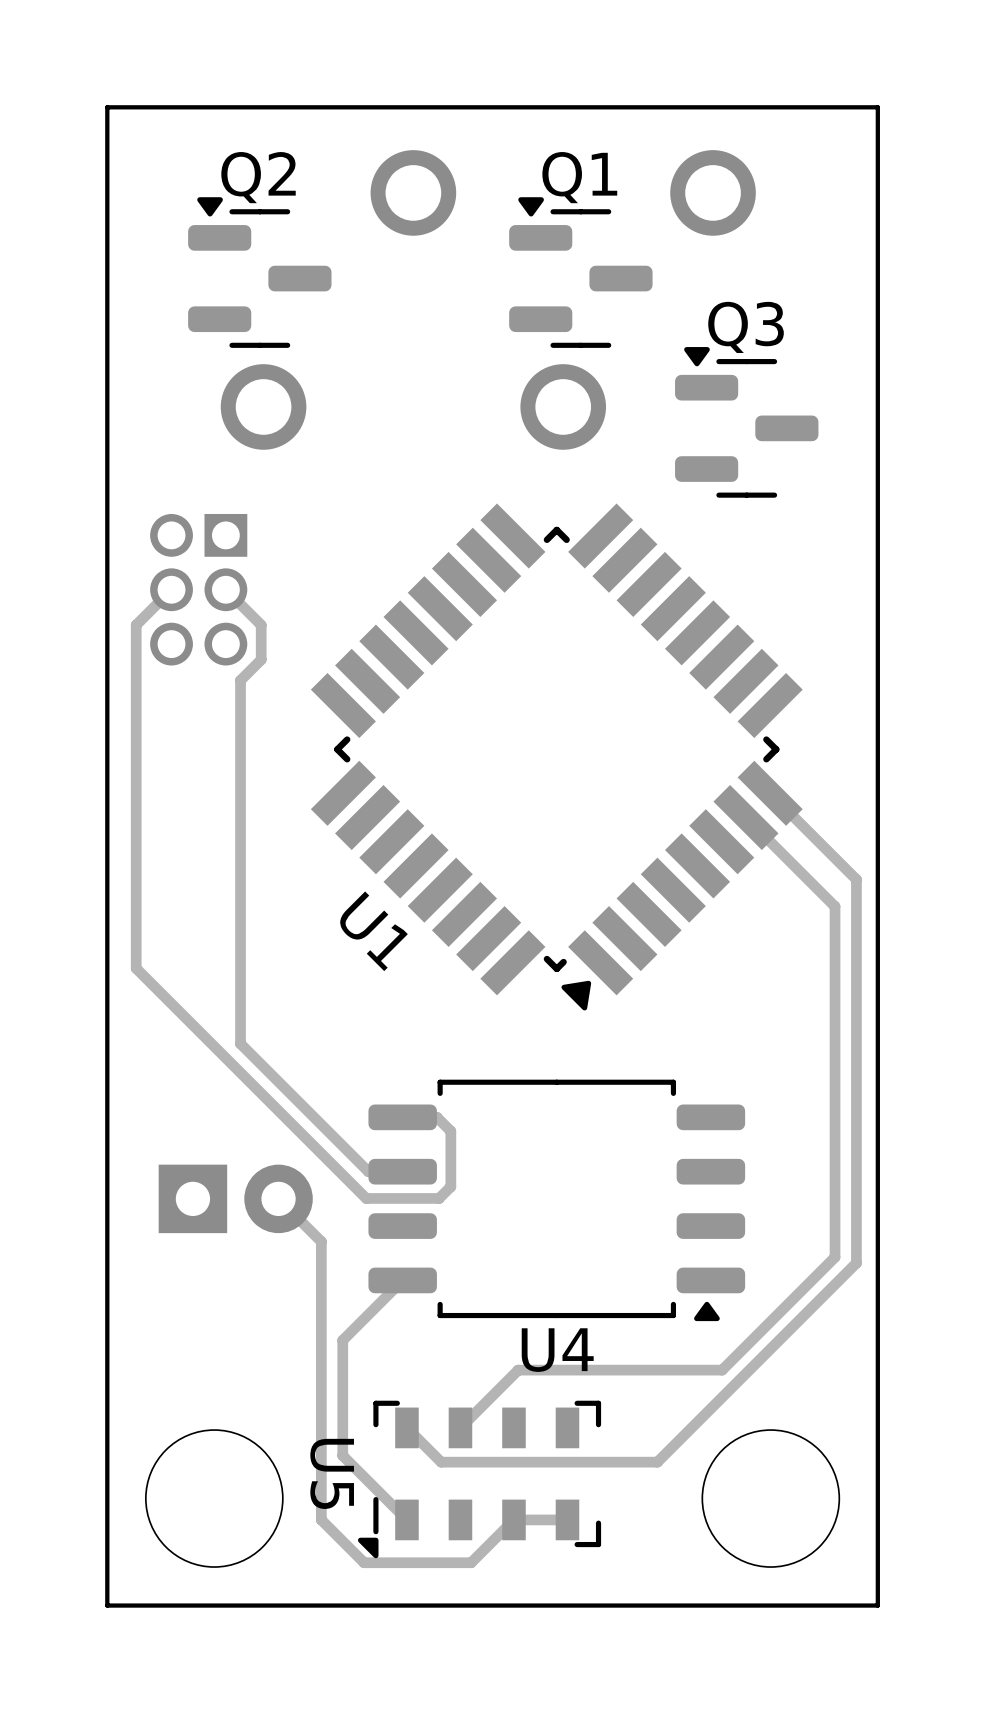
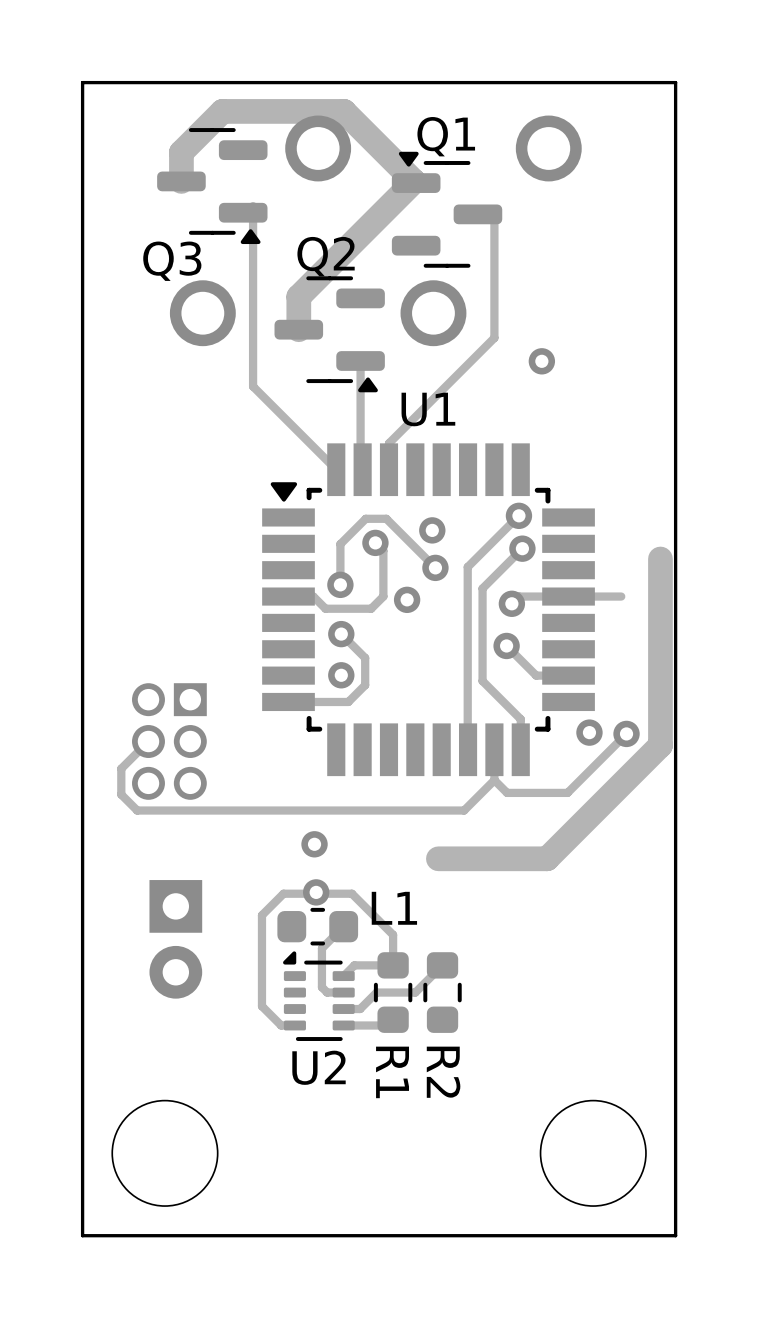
track: none -> (181, 181) (181, 152) (222, 111) (344, 111) (414, 181) (298, 296) (298, 329)
track: none -> (253, 206) (253, 386) (336, 469)
Q2 rotation: 0° (259, 272) -> 180° (329, 334)
Q2 position: (259, 272) -> (329, 334)
track: none -> (494, 214) (494, 337) (388, 443) (388, 469)
Q3 rotation: 0° (746, 422) -> 180° (212, 186)
Q3 position: (746, 422) -> (212, 186)
track: none -> (360, 360) (360, 467) (362, 469)
via: none -> (541, 361)
track: (171, 589) (136, 625) (136, 968) (366, 1198) (439, 1198) (450, 1186) (450, 1131) (436, 1117) (402, 1117) -> none
part position: (198, 589) -> (169, 741)
track: (225, 589) (261, 625) (261, 659) (240, 680) (240, 1043) (368, 1171) (402, 1171) -> none
track: none -> (518, 515) (467, 567) (467, 749)
via: none -> (518, 515)
via: none -> (432, 530)
track: none -> (375, 542) (383, 550) (383, 596) (371, 608) (325, 608) (313, 596) (288, 596)
via: none -> (375, 542)
track: none -> (522, 548) (482, 588) (482, 681) (520, 719) (520, 749)
via: none -> (522, 548)
track: none -> (660, 558) (660, 745) (547, 858) (438, 858)
track: none -> (435, 567) (386, 518) (365, 518) (340, 544) (340, 584)
via: none -> (435, 567)
U1 rotation: 0° (556, 756) -> 135° clockwise (428, 609)
via: none -> (340, 584)
track: none -> (621, 596) (519, 596) (511, 603)
via: none -> (407, 599)
via: none -> (511, 603)
track: (770, 793) (856, 879) (856, 1263) (657, 1462) (441, 1462) (406, 1427) -> none
track: (745, 817) (835, 906) (835, 1257) (722, 1370) (518, 1370) (460, 1427) -> none
track: none -> (341, 634) (365, 657) (365, 685) (348, 701) (288, 701)
via: none -> (341, 634)
track: none -> (506, 645) (536, 675) (568, 675)
via: none -> (506, 645)
via: none -> (341, 675)
via: none -> (589, 732)
track: none -> (626, 733) (567, 792) (507, 792) (494, 780)
via: none -> (626, 733)
track: none -> (148, 741) (121, 768) (121, 794) (137, 810) (464, 810) (494, 780)
via: none -> (314, 844)
via: none -> (316, 892)
part rotation: 0° (235, 1198) -> 90° clockwise (175, 939)
track: (278, 1198) (321, 1241) (321, 1519) (364, 1562) (471, 1562) (513, 1519) (567, 1519) -> none
U4: (556, 1200) -> none
L1: none -> (317, 926)
track: none -> (343, 926) (321, 948) (321, 987) (327, 992) (343, 992)
track: none -> (442, 965) (415, 992) (376, 992) (360, 1009) (343, 1009)
track: none -> (343, 976) (354, 965) (393, 965) (393, 934) (351, 893) (283, 893) (261, 915) (261, 1006) (281, 1025) (294, 1025)
track: (402, 1280) (342, 1340) (342, 1455) (406, 1519) -> none
R1: none -> (393, 992)
R2: none -> (442, 992)
U2: none -> (318, 996)
track: none -> (387, 1025) (343, 1025)
U5: (479, 1479) -> none

